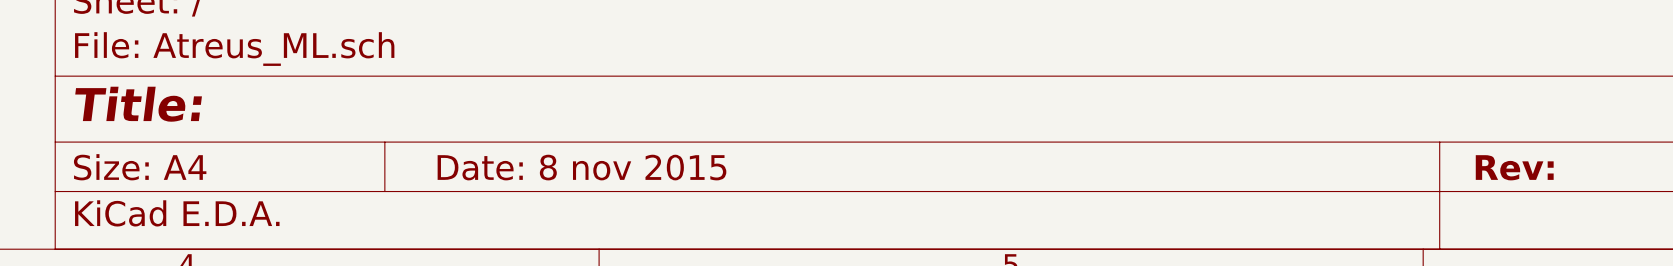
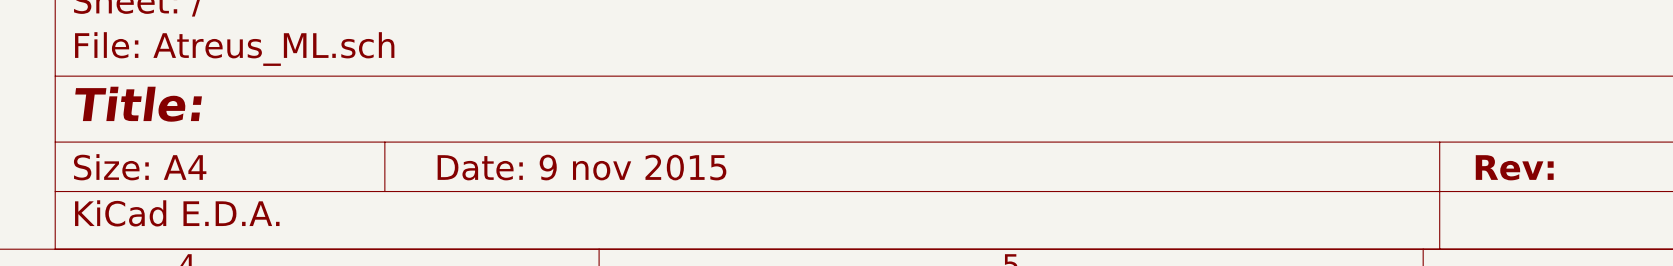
title block: Date: 8 nov 2015 (581, 167) -> Date: 9 nov 2015 (581, 167)

